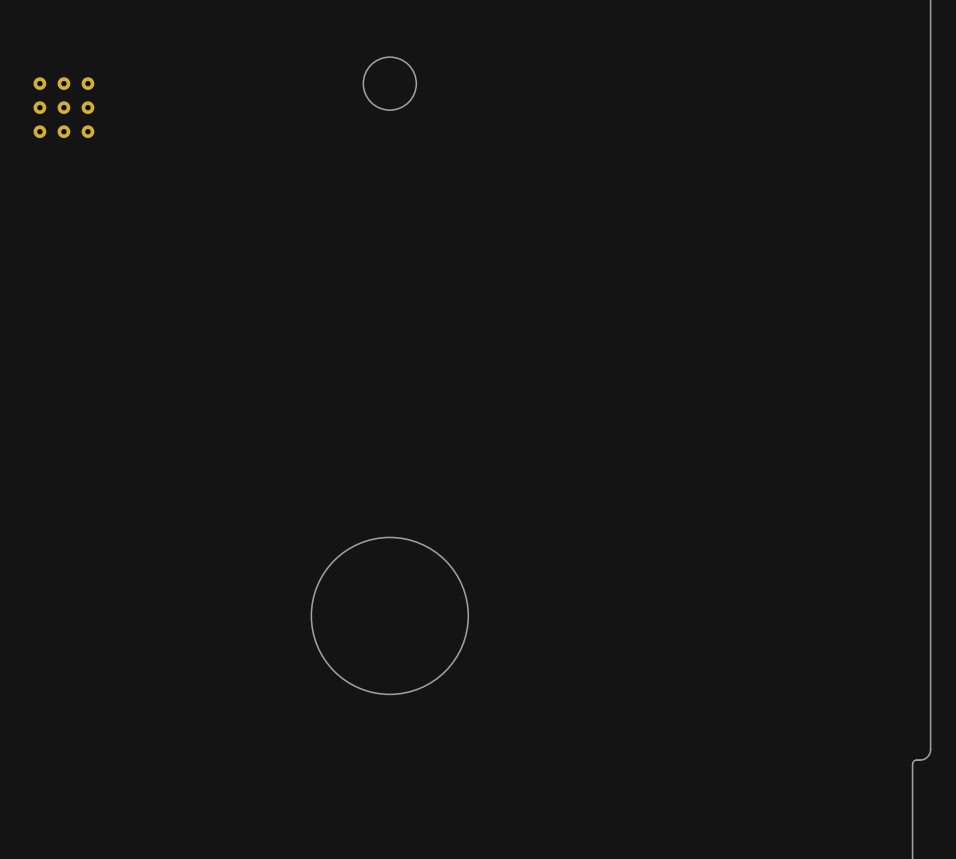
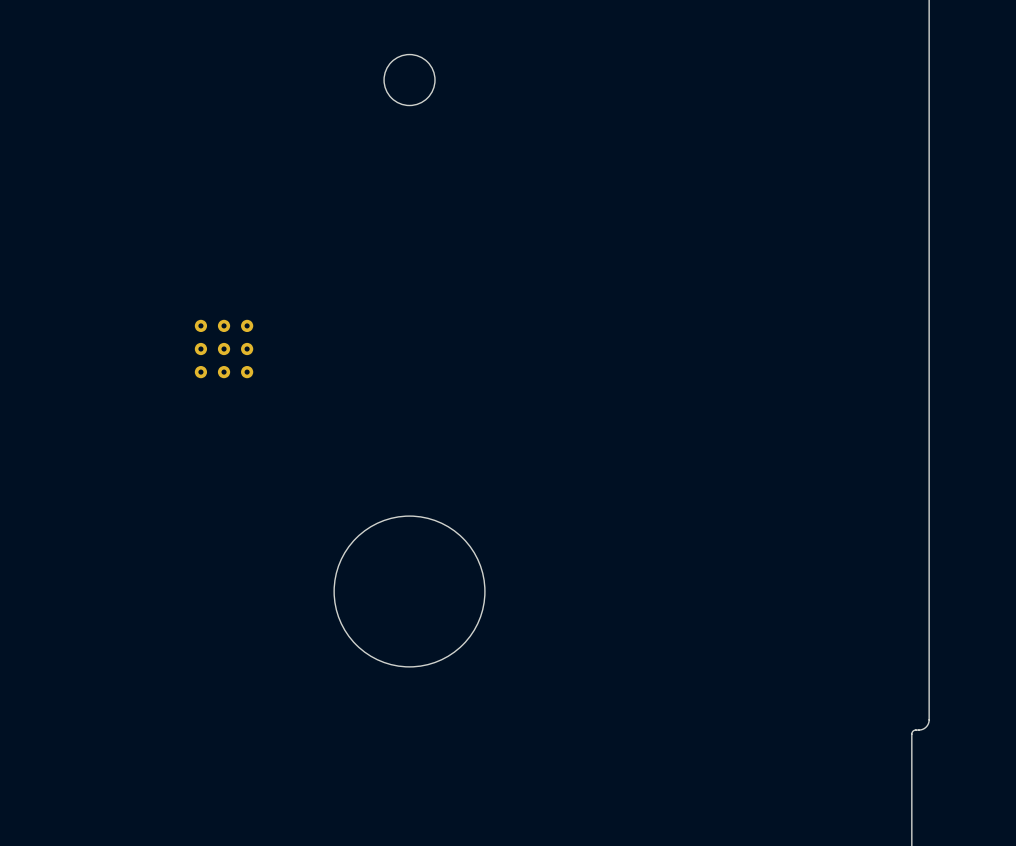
part position: (63, 107) -> (224, 349)

